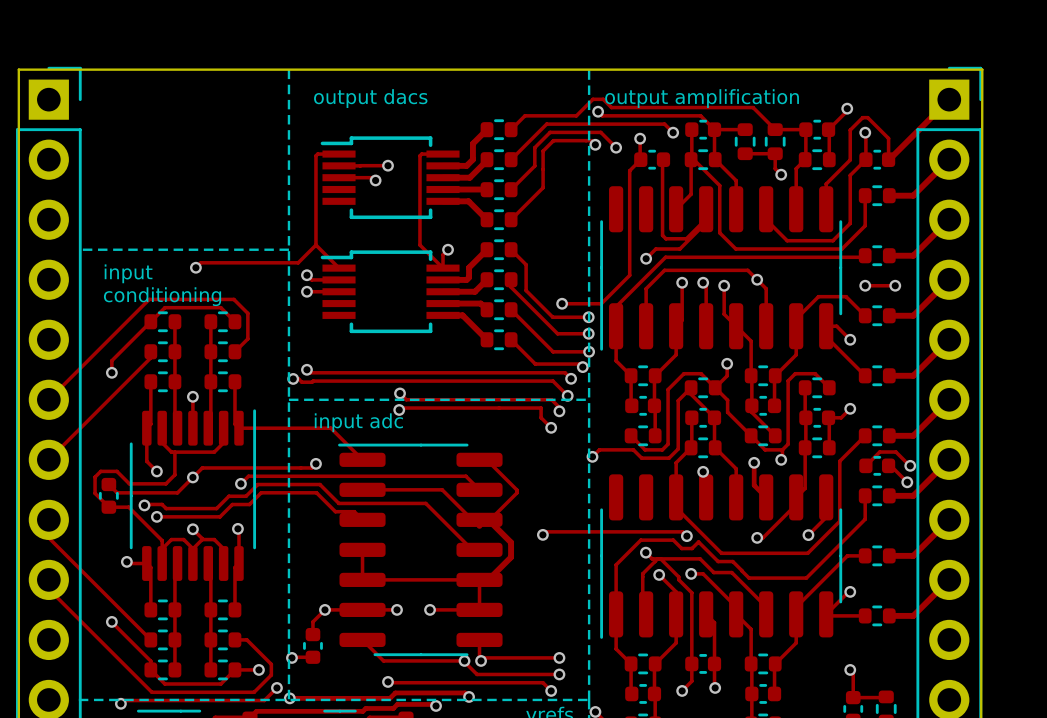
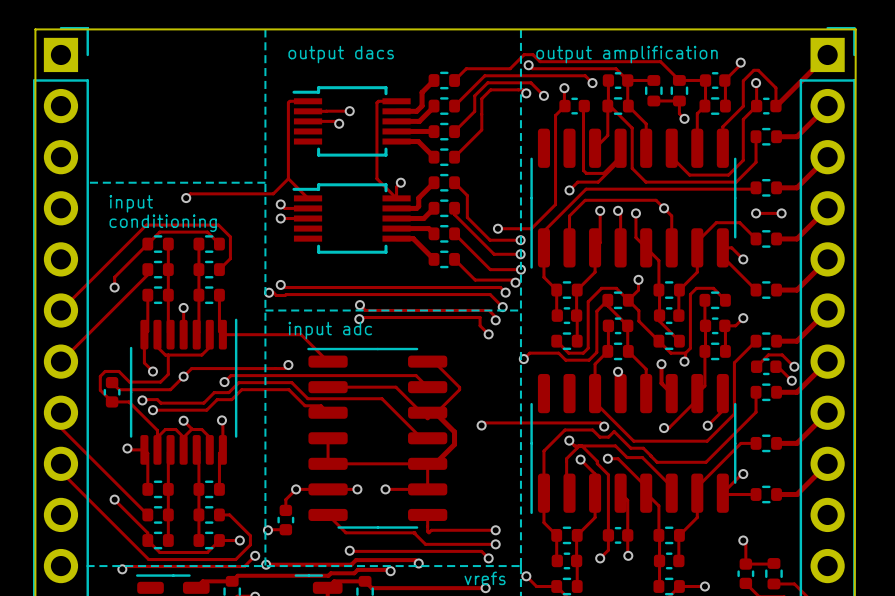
via: (464, 660) -> none
via: (481, 660) -> none

